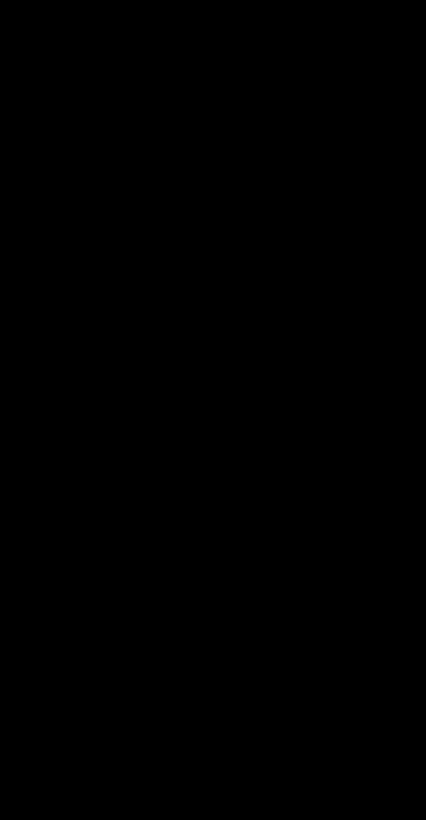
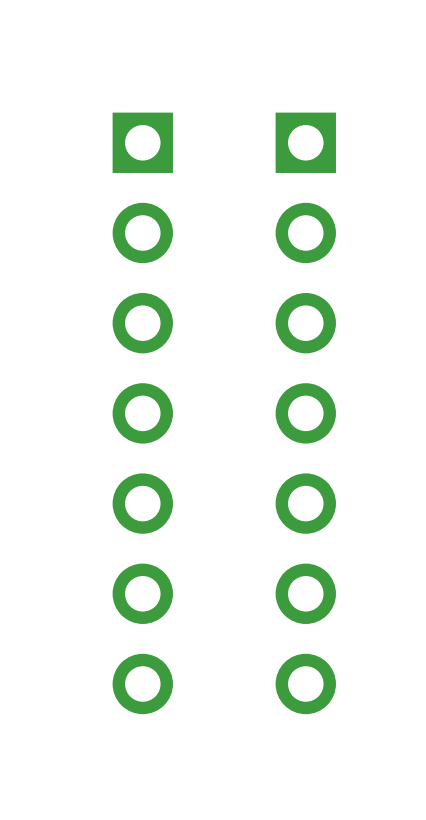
part: none -> (142, 413)
part: none -> (305, 413)

